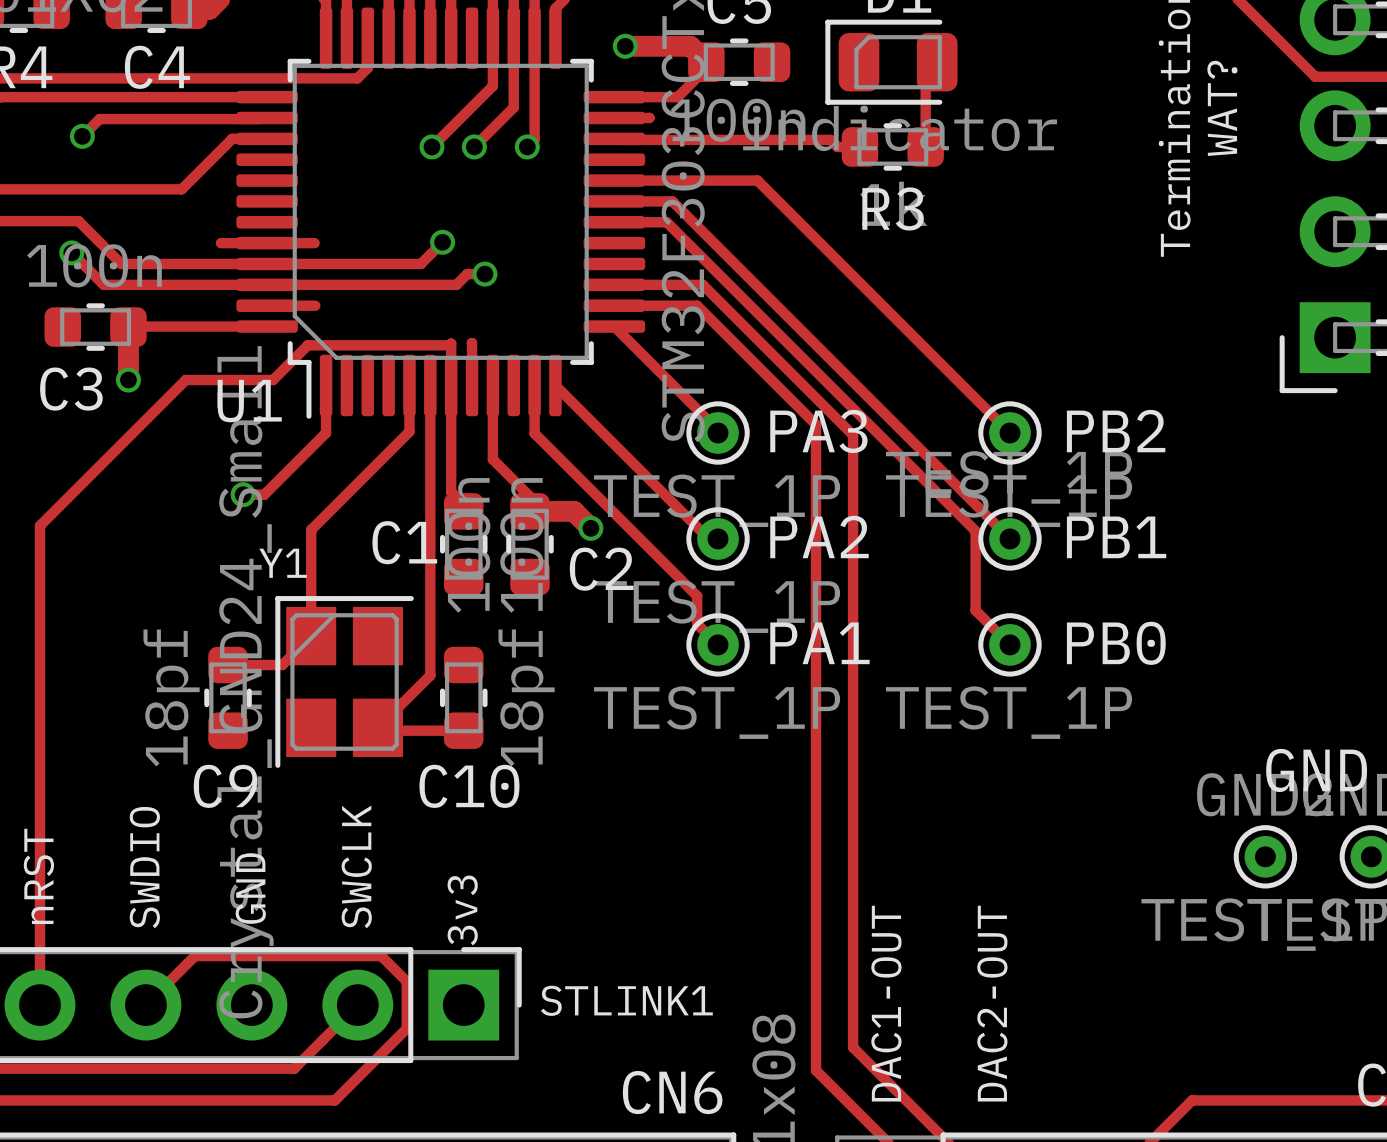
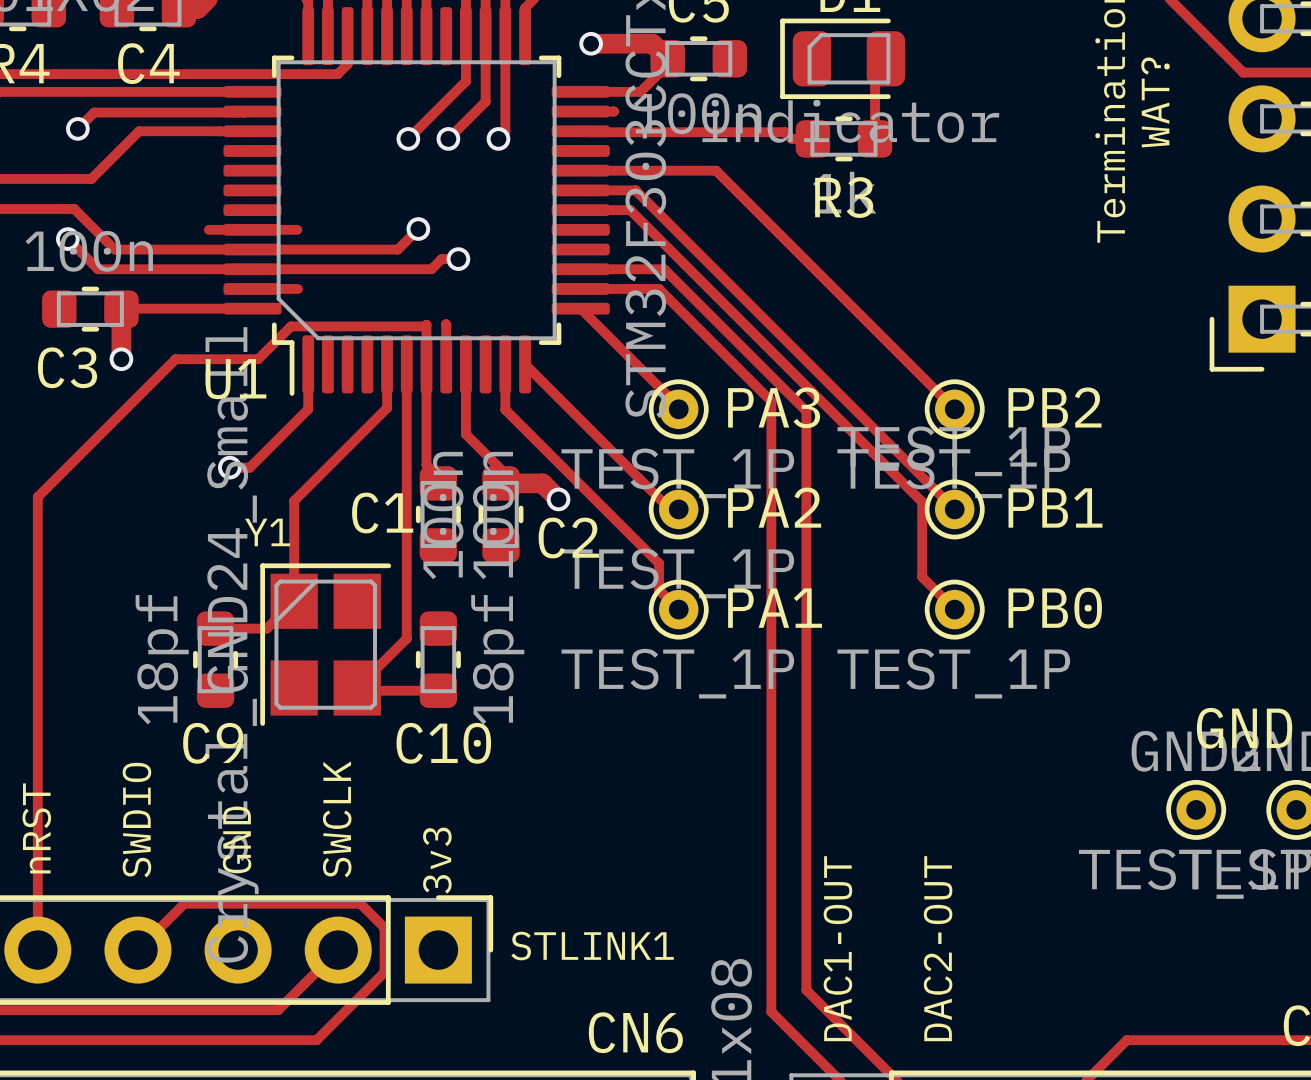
track: (232, 138) (181, 189) (96, 189) -> (219, 131) (139, 131) (91, 178)

